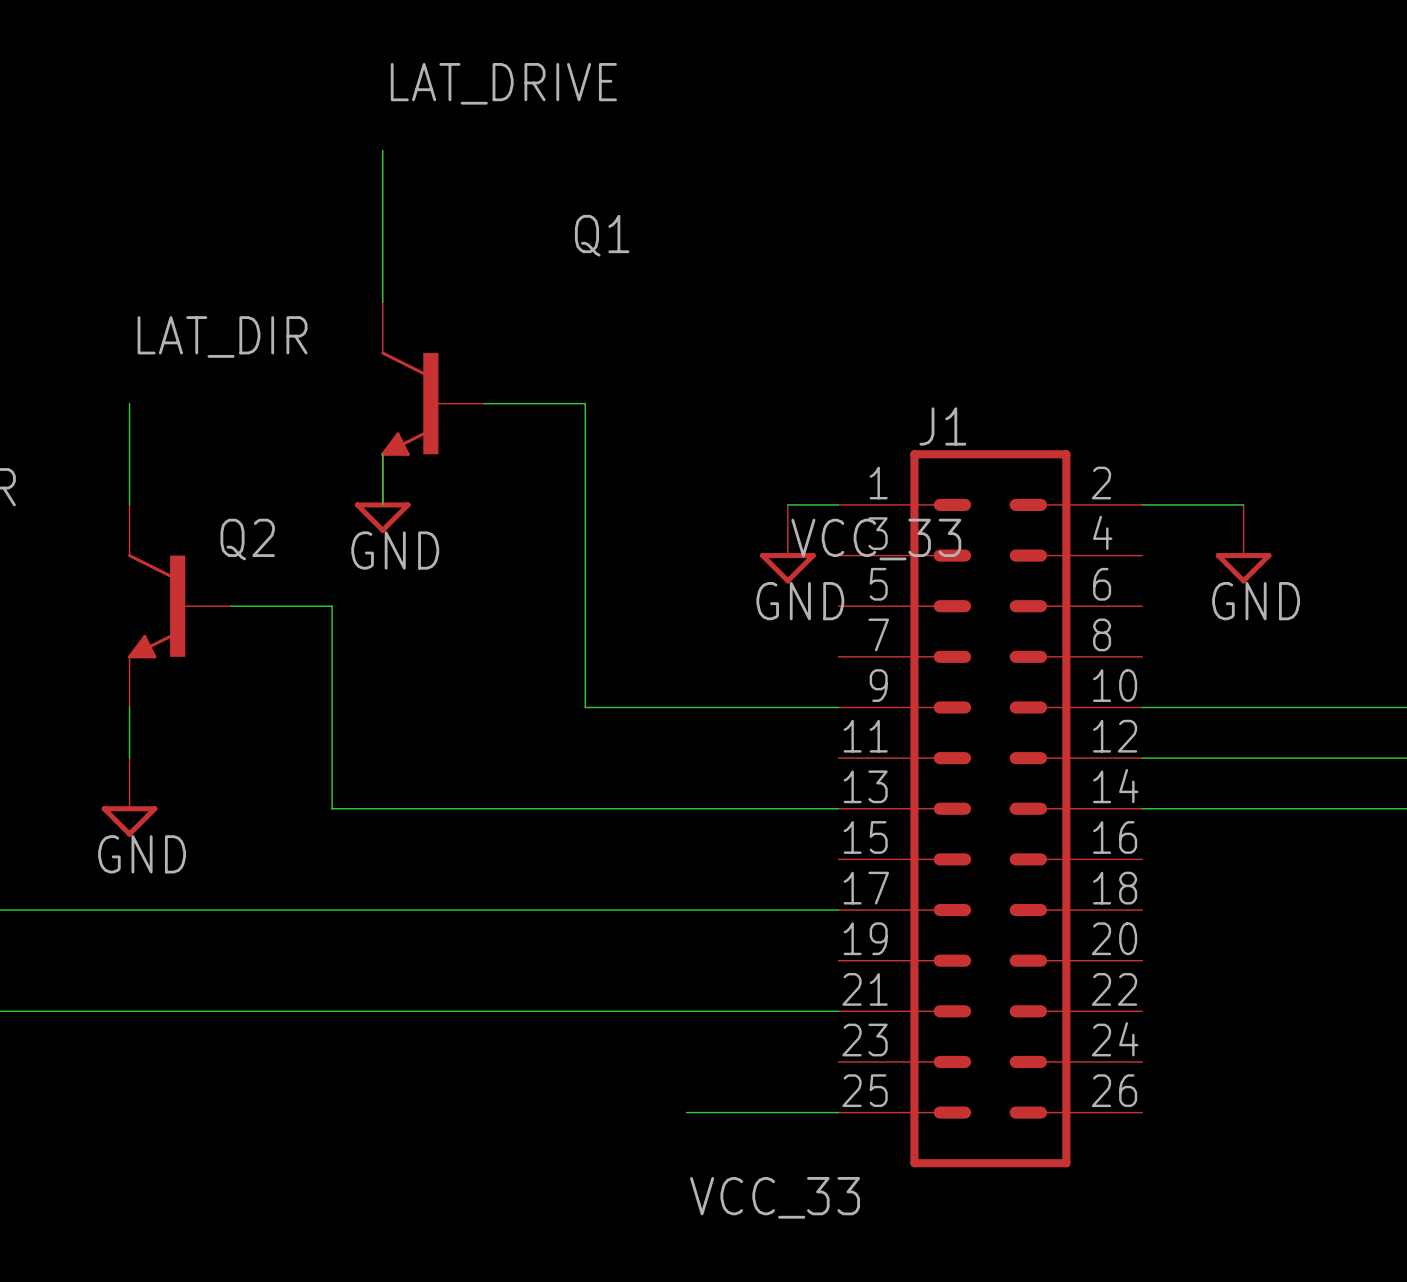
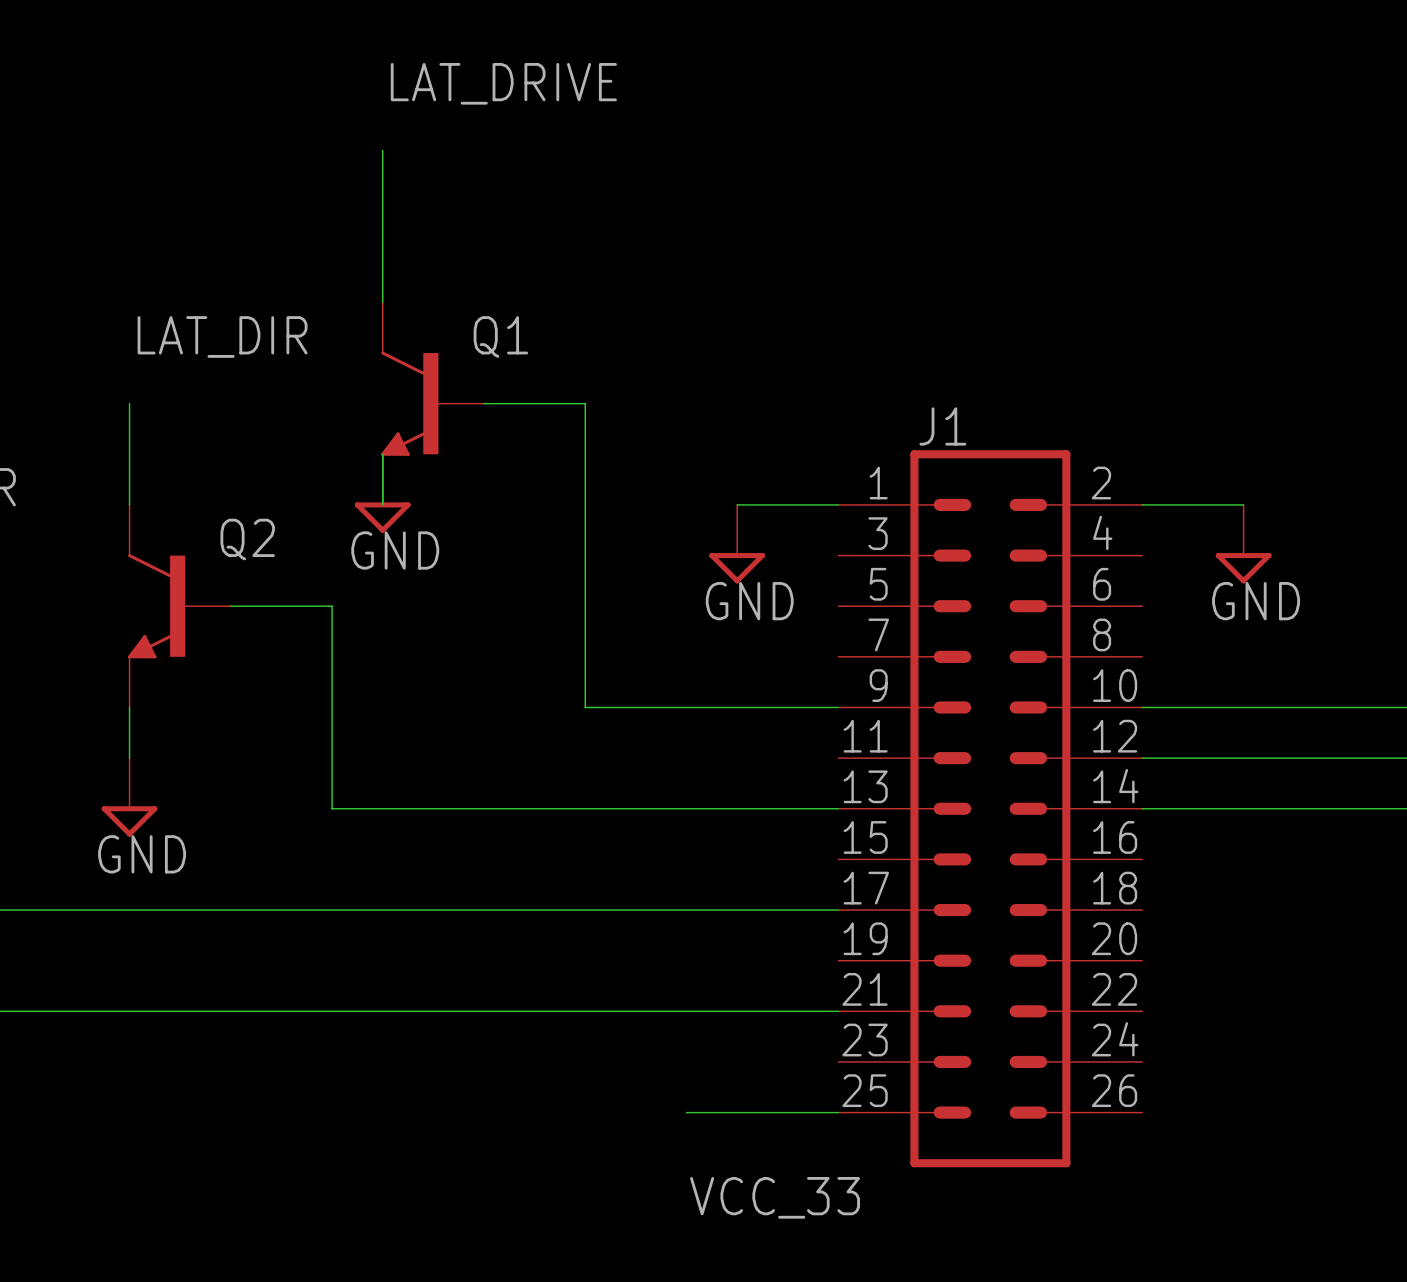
Q1 name position: Q1 (602, 235) -> Q1 (500, 336)
wire: none -> (737, 504) (787, 504)
label: VCC_33 (876, 539) -> none
power symbol position: GND (787, 544) -> GND (737, 544)

